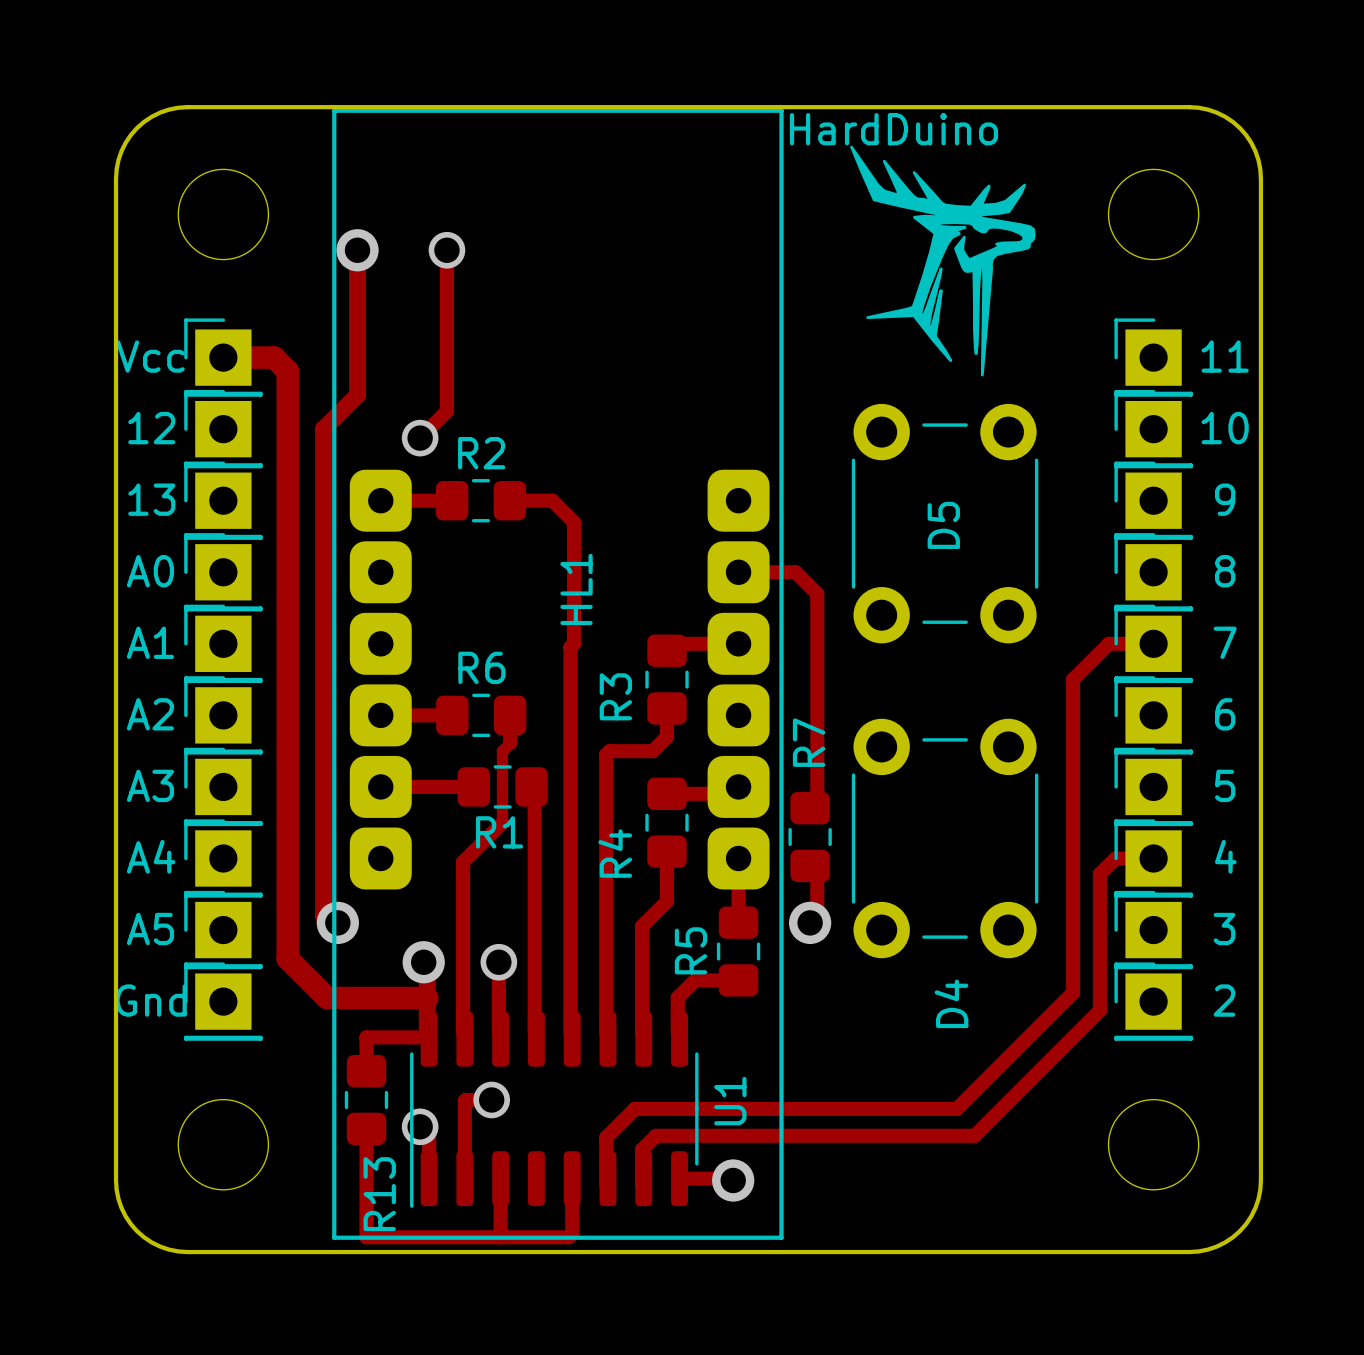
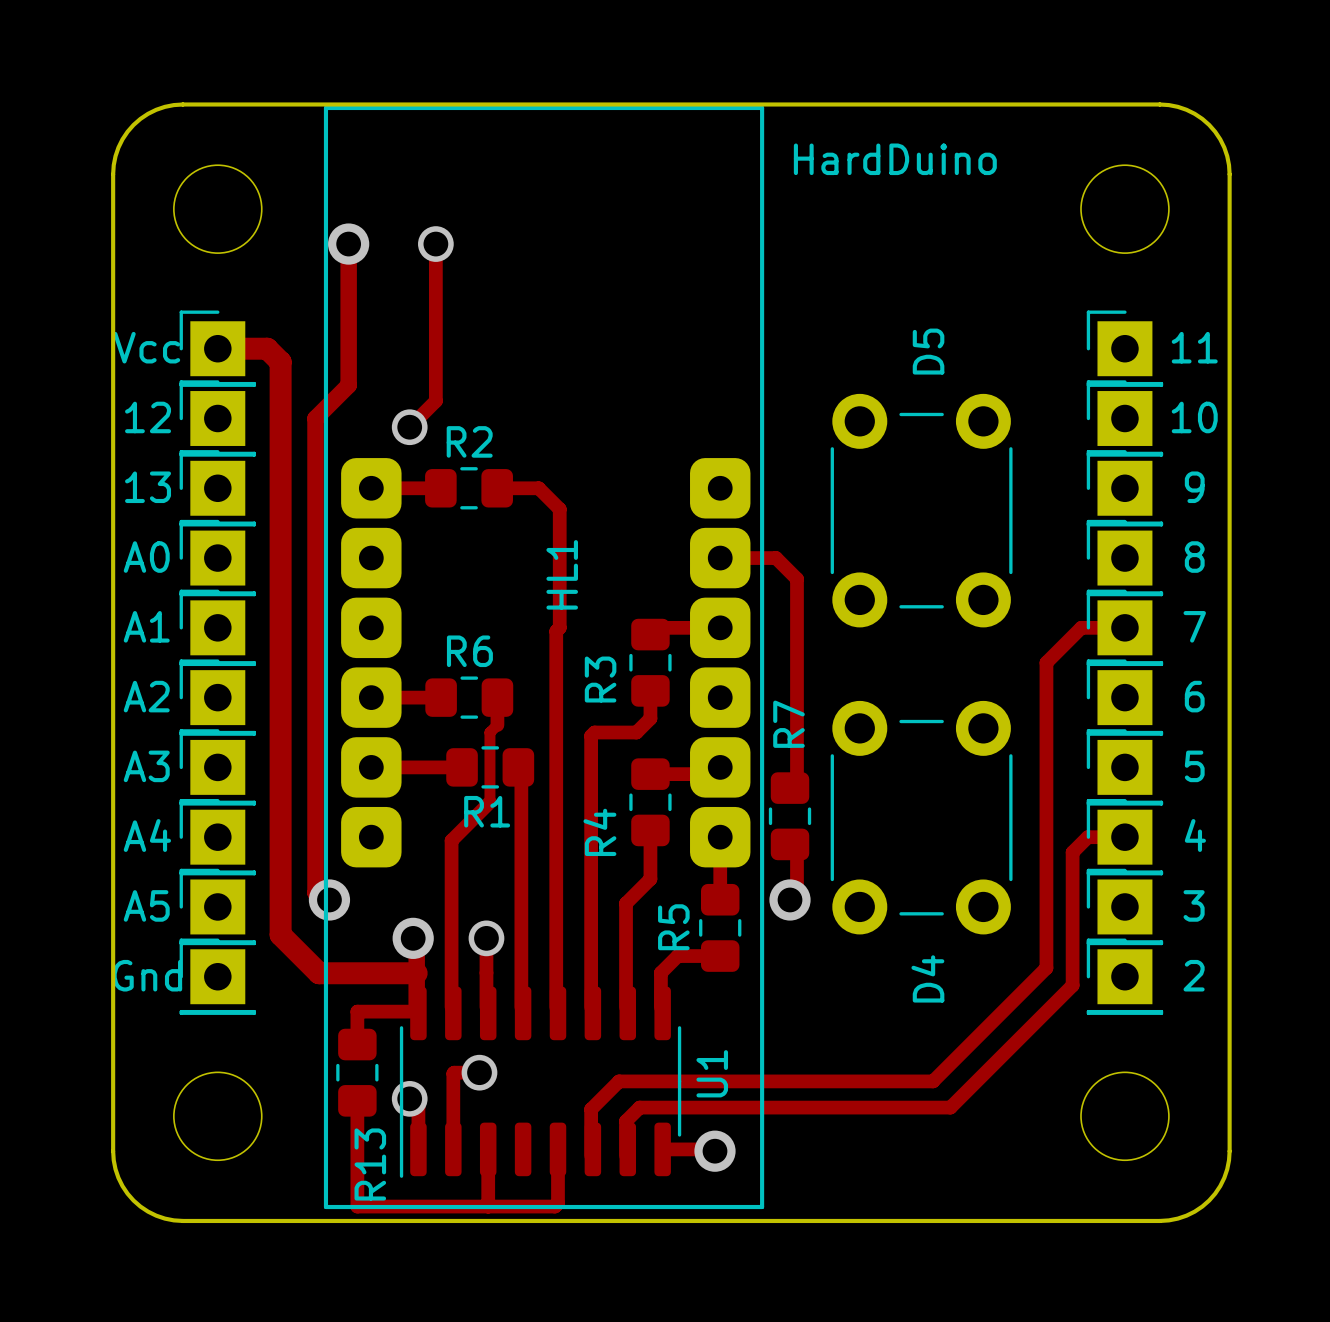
text position: HardDuino (893, 129) -> HardDuino (895, 159)
drawing: [850, 145, 1036, 377] -> none
D5 name position: D5 (943, 525) -> D5 (928, 351)

